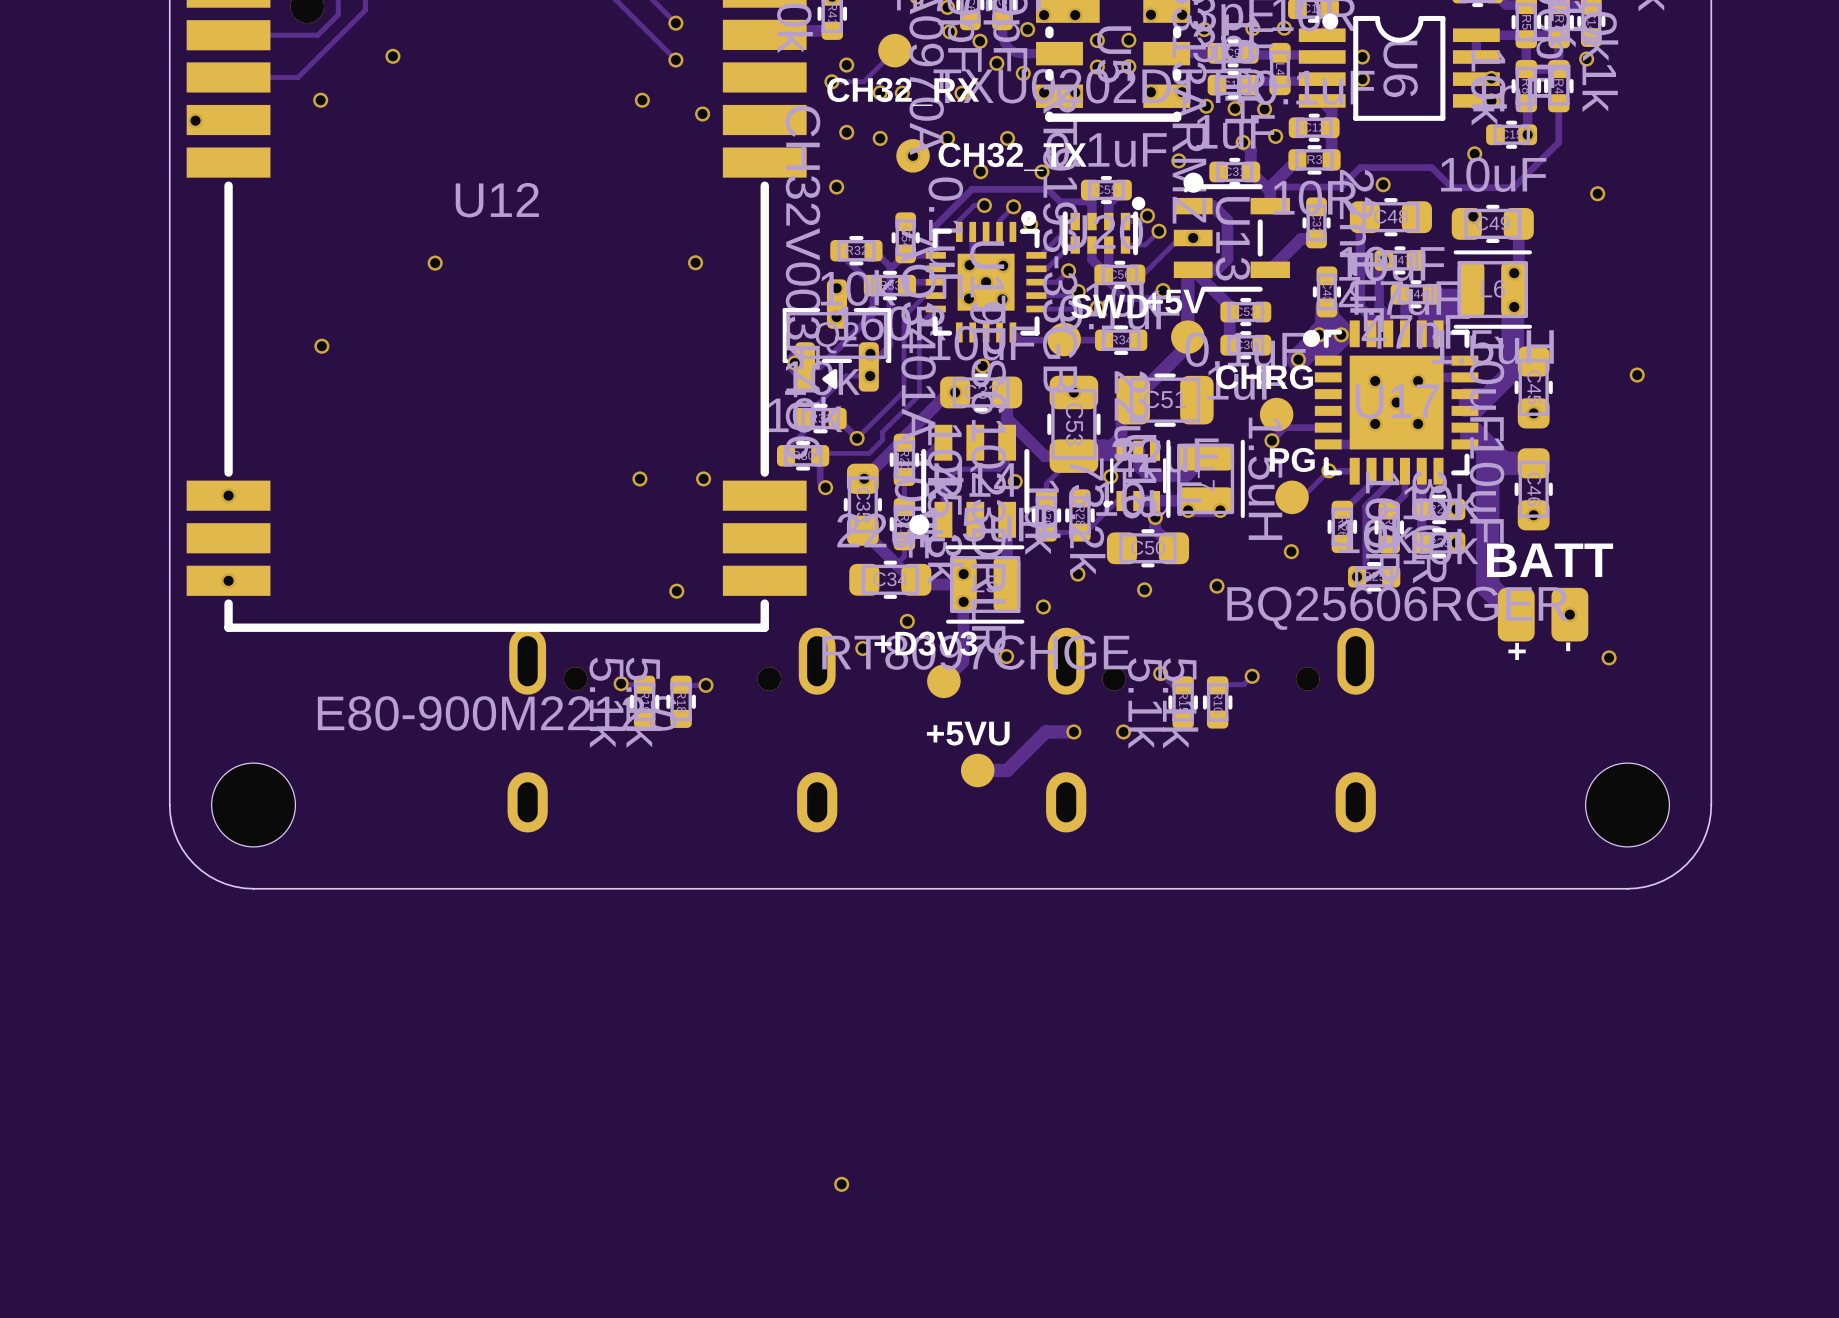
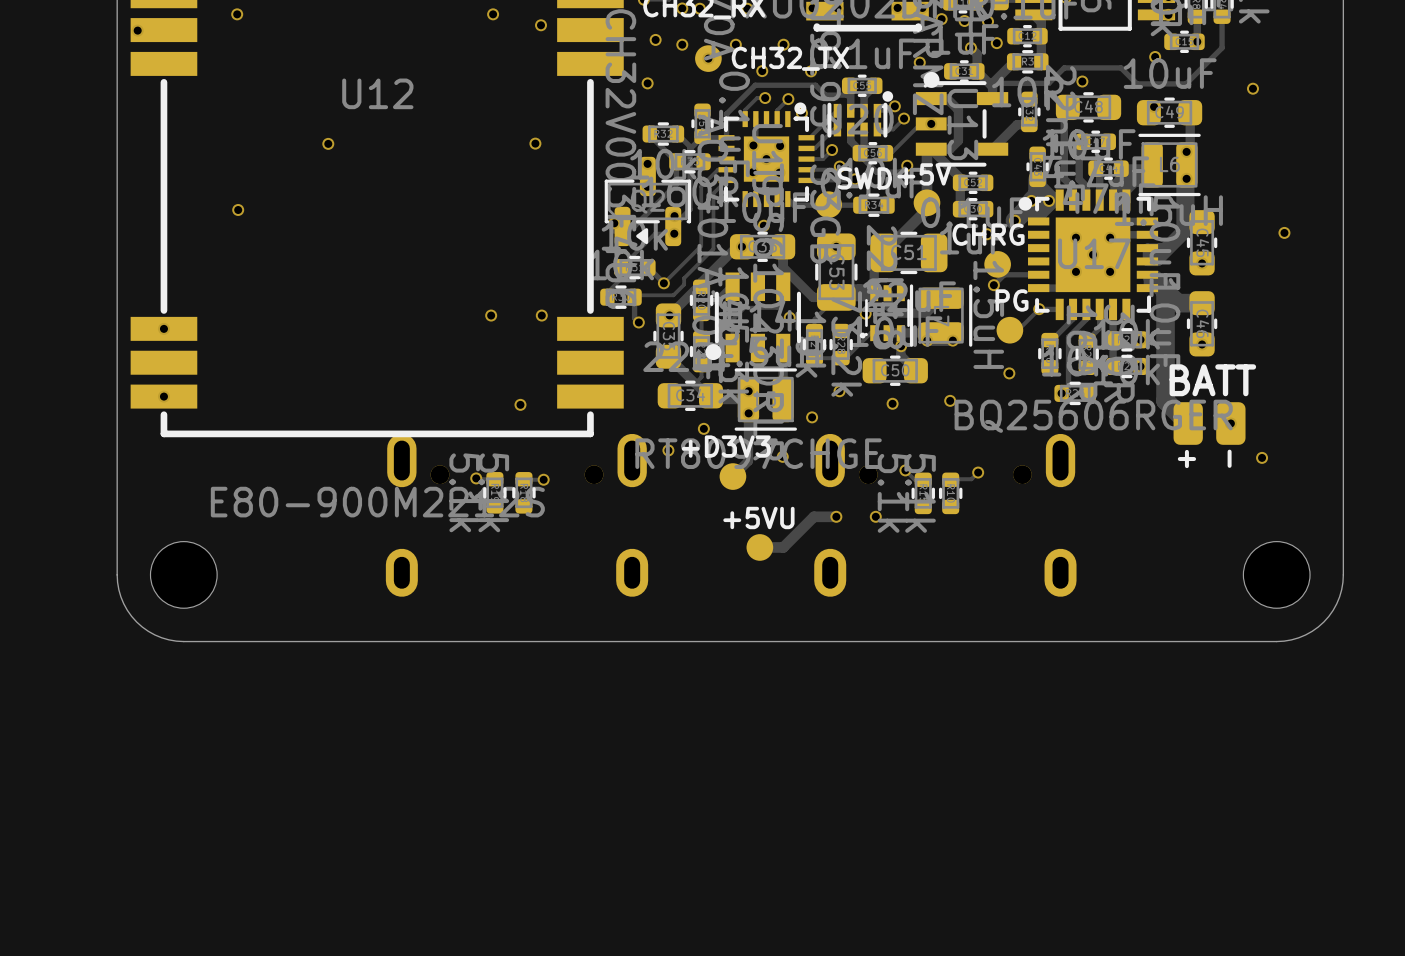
via: (841, 1184) -> none

